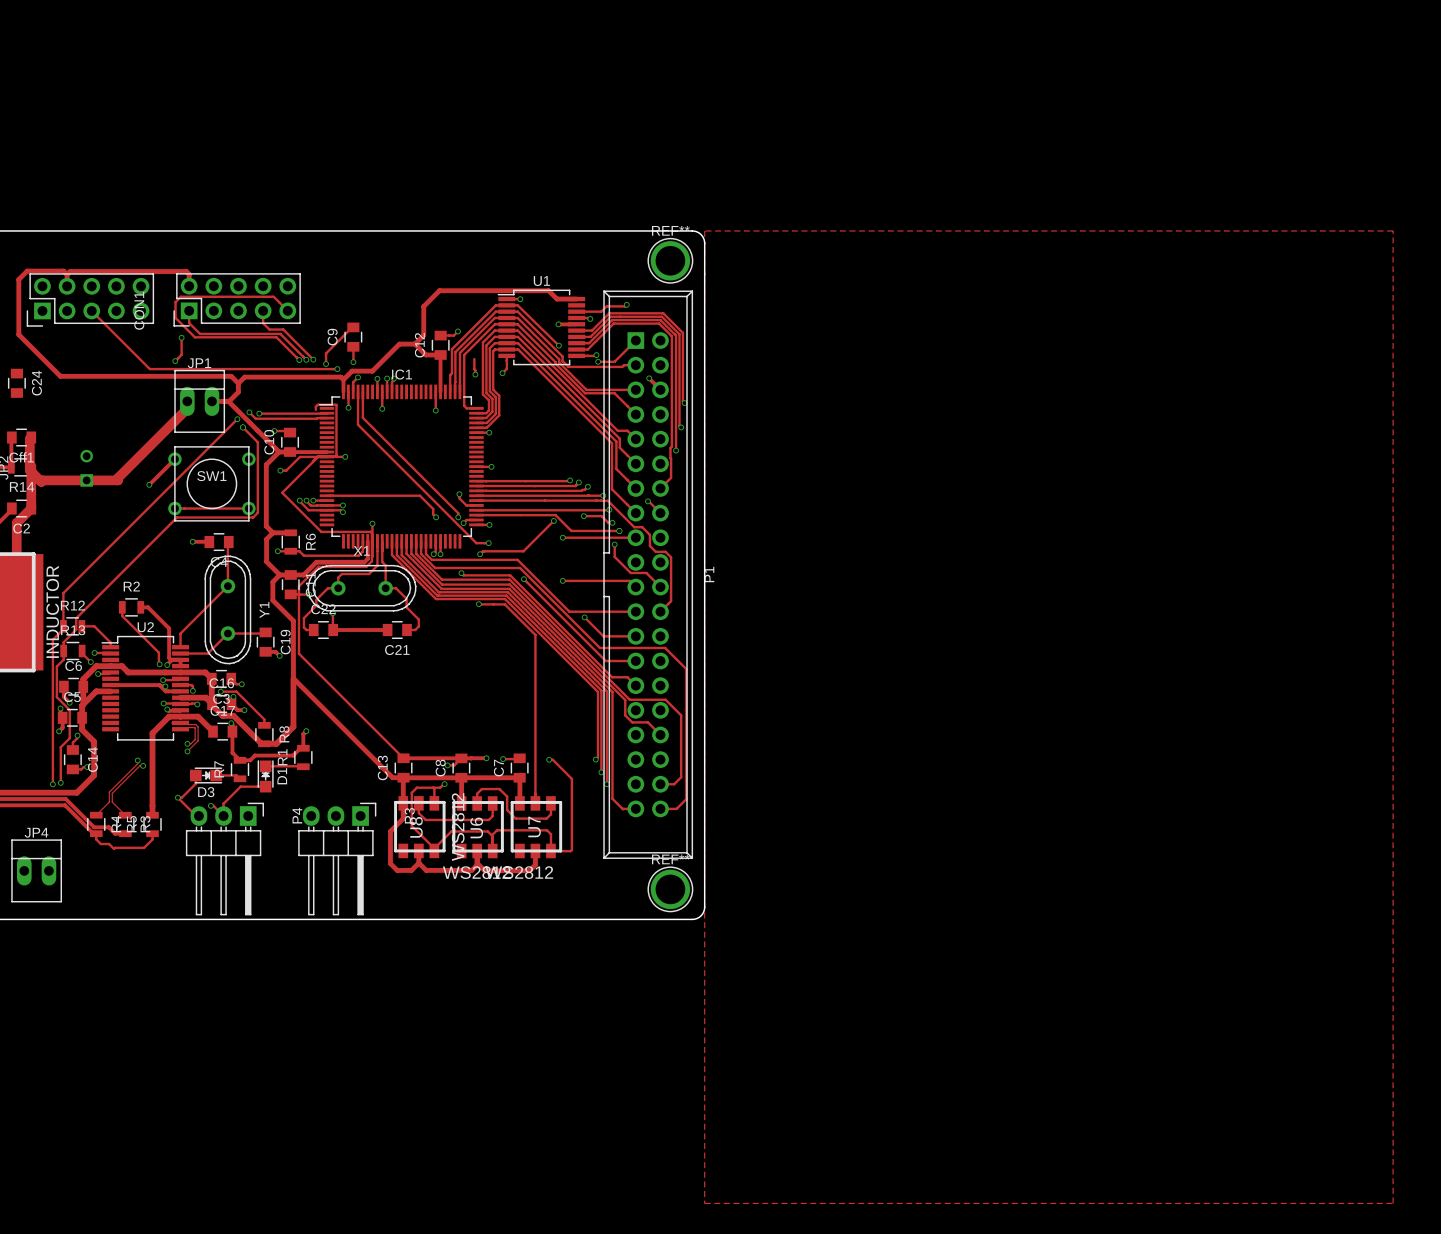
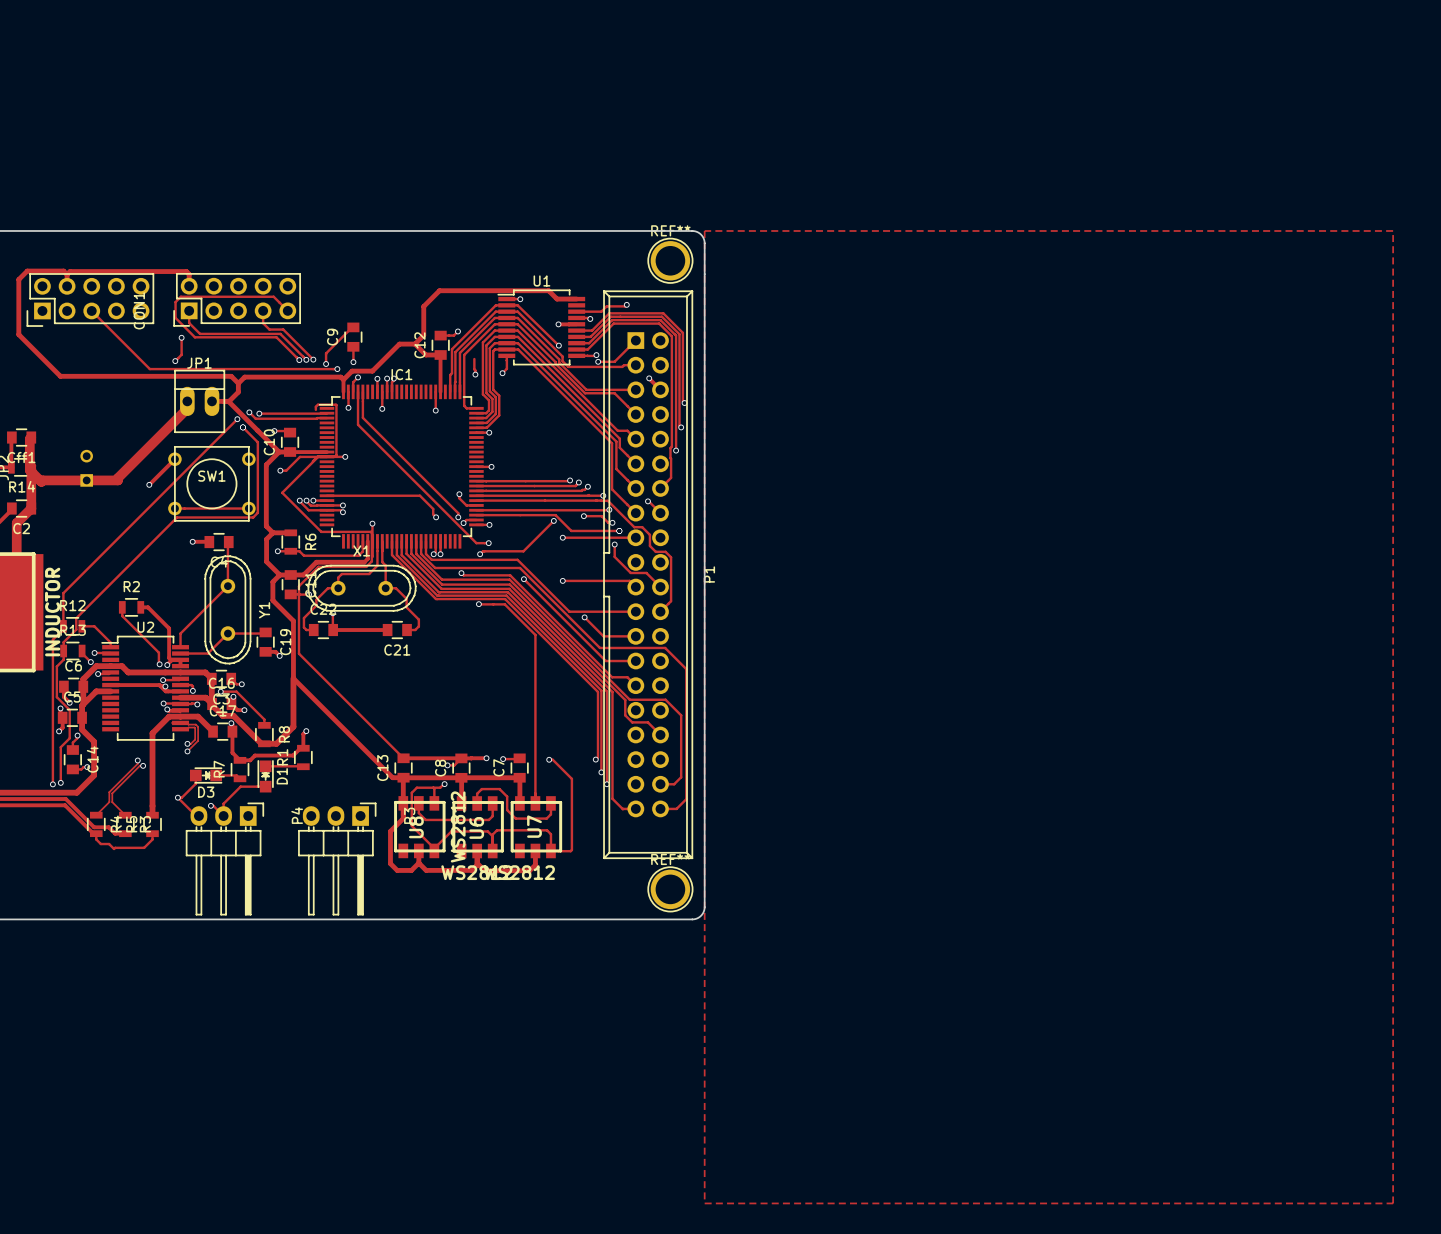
C24: (16, 383) -> none
JP4: (36, 870) -> none

